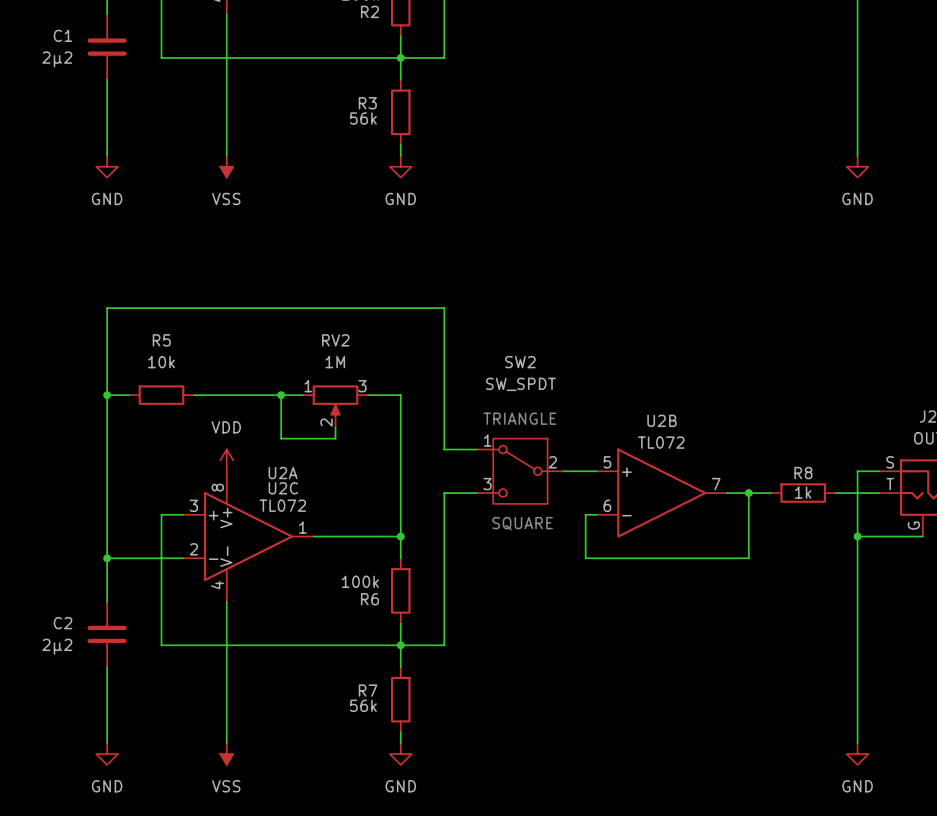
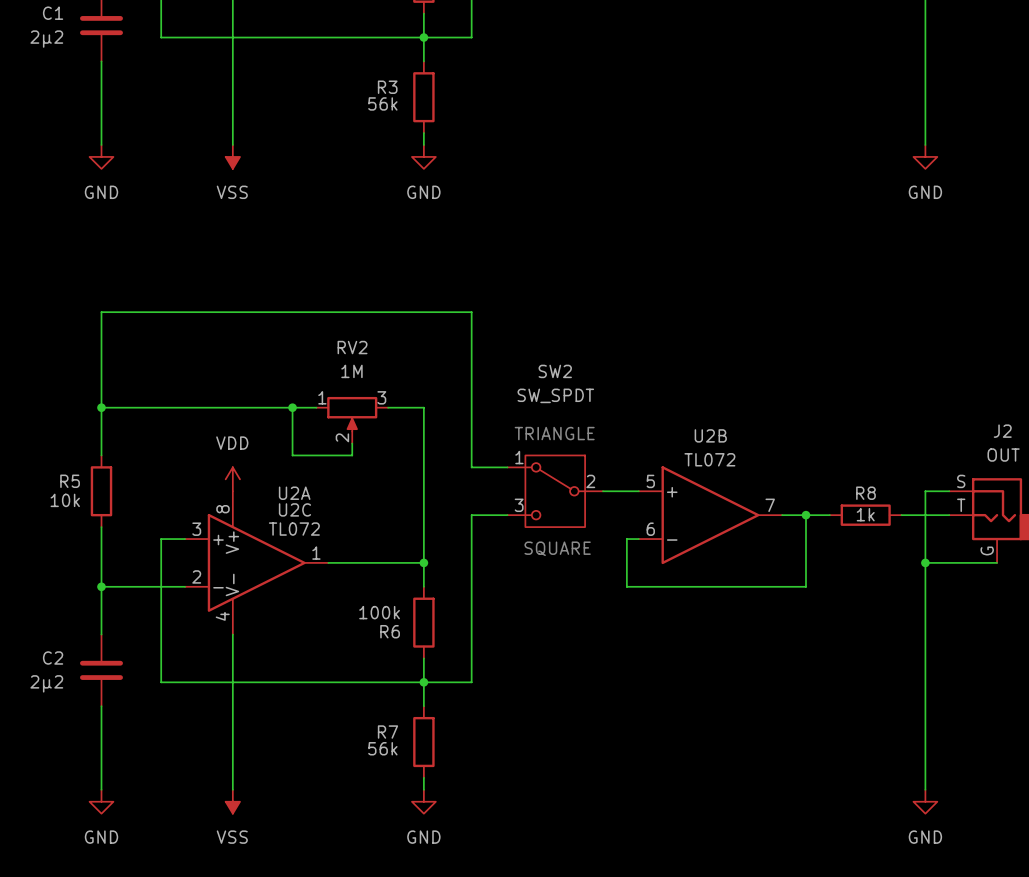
R5 name position: R5 (161, 340) -> R5 (70, 481)
R5 value position: 10k (161, 362) -> 10k (65, 500)
wire: none -> (125, 407) (197, 407)
R5 rotation: 0° (161, 395) -> 90° clockwise (101, 491)
R5 position: (161, 395) -> (101, 491)
wire: (107, 438) (107, 503) -> none

